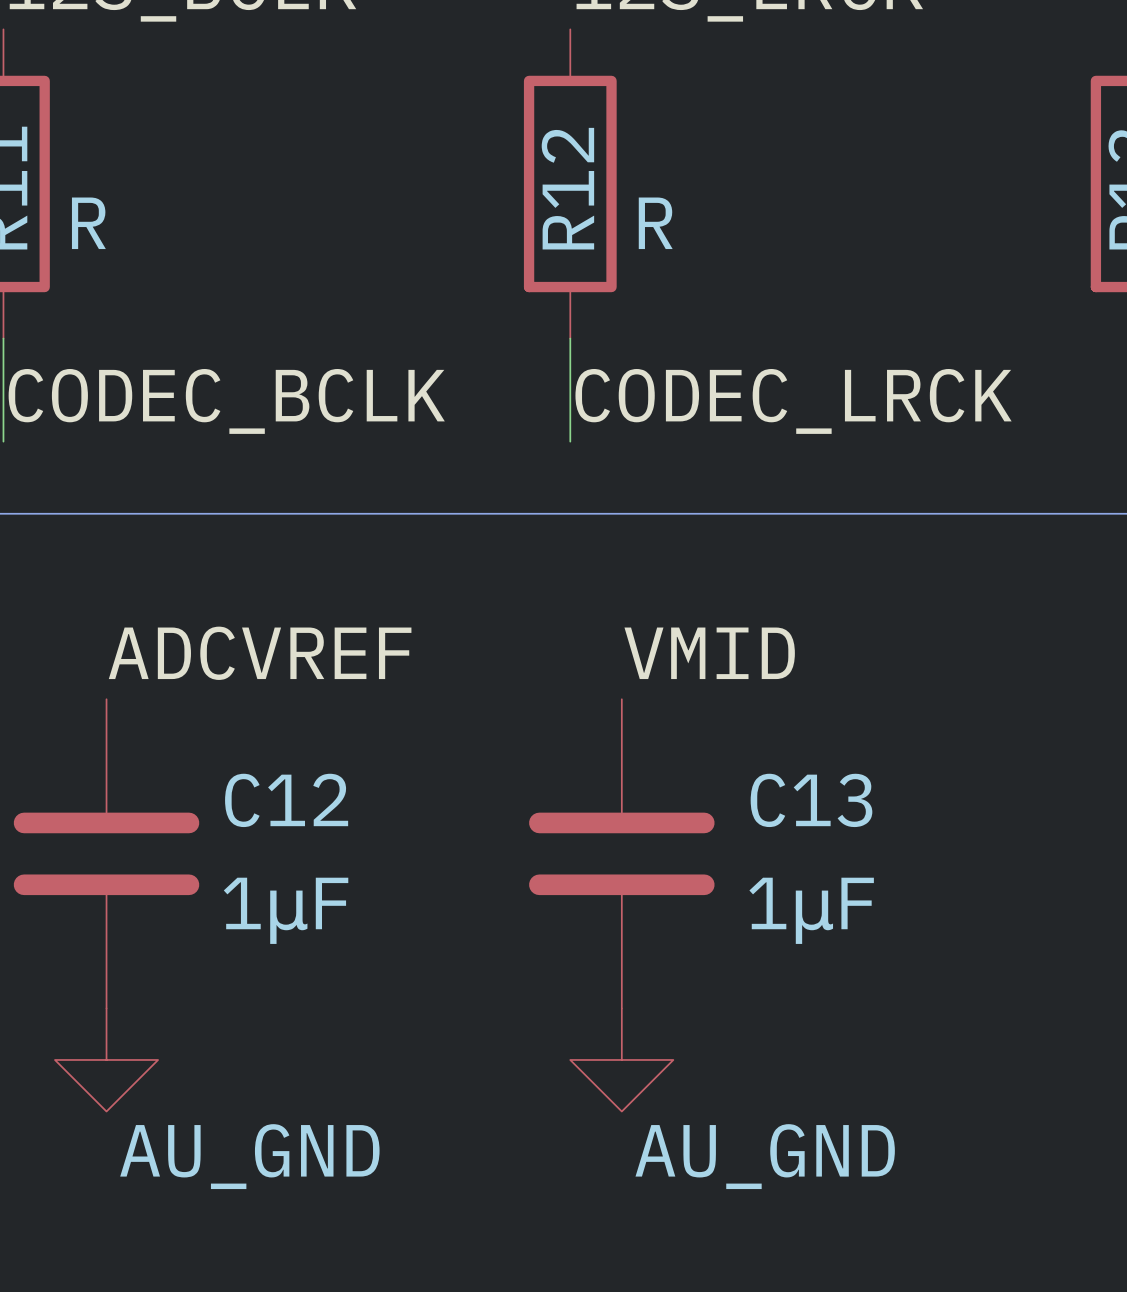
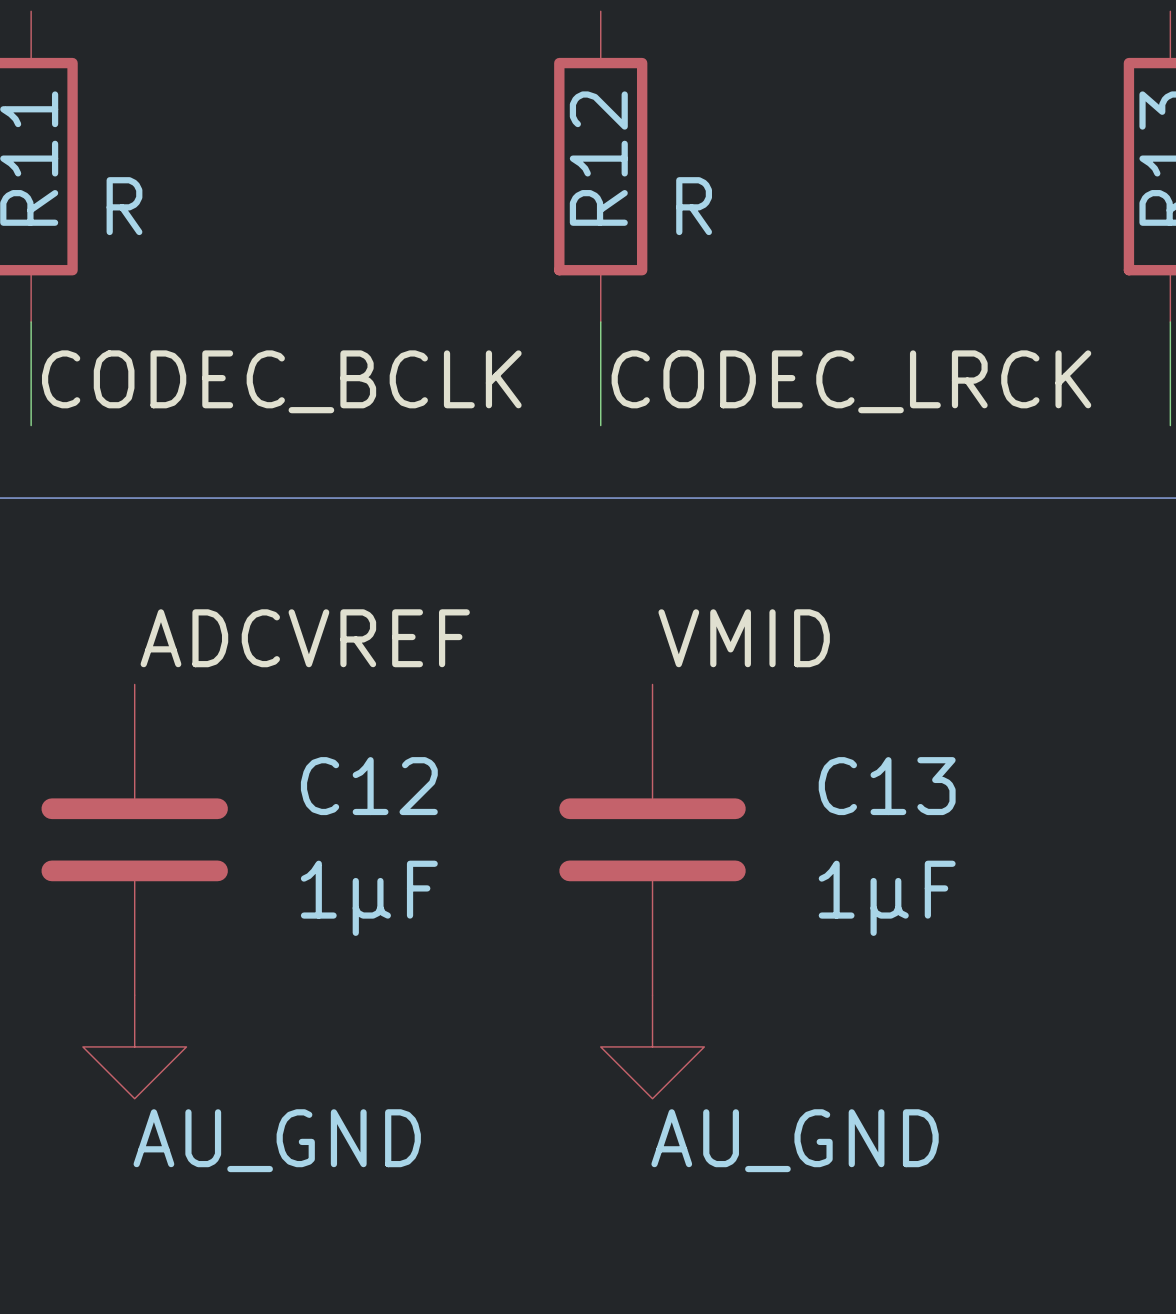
C12 name position: C12 (286, 800) -> C12 (369, 786)
C13 name position: C13 (811, 800) -> C13 (887, 786)
C12 value position: 1μF (286, 910) -> 1μF (369, 898)
C13 value position: 1μF (811, 910) -> 1μF (887, 898)

